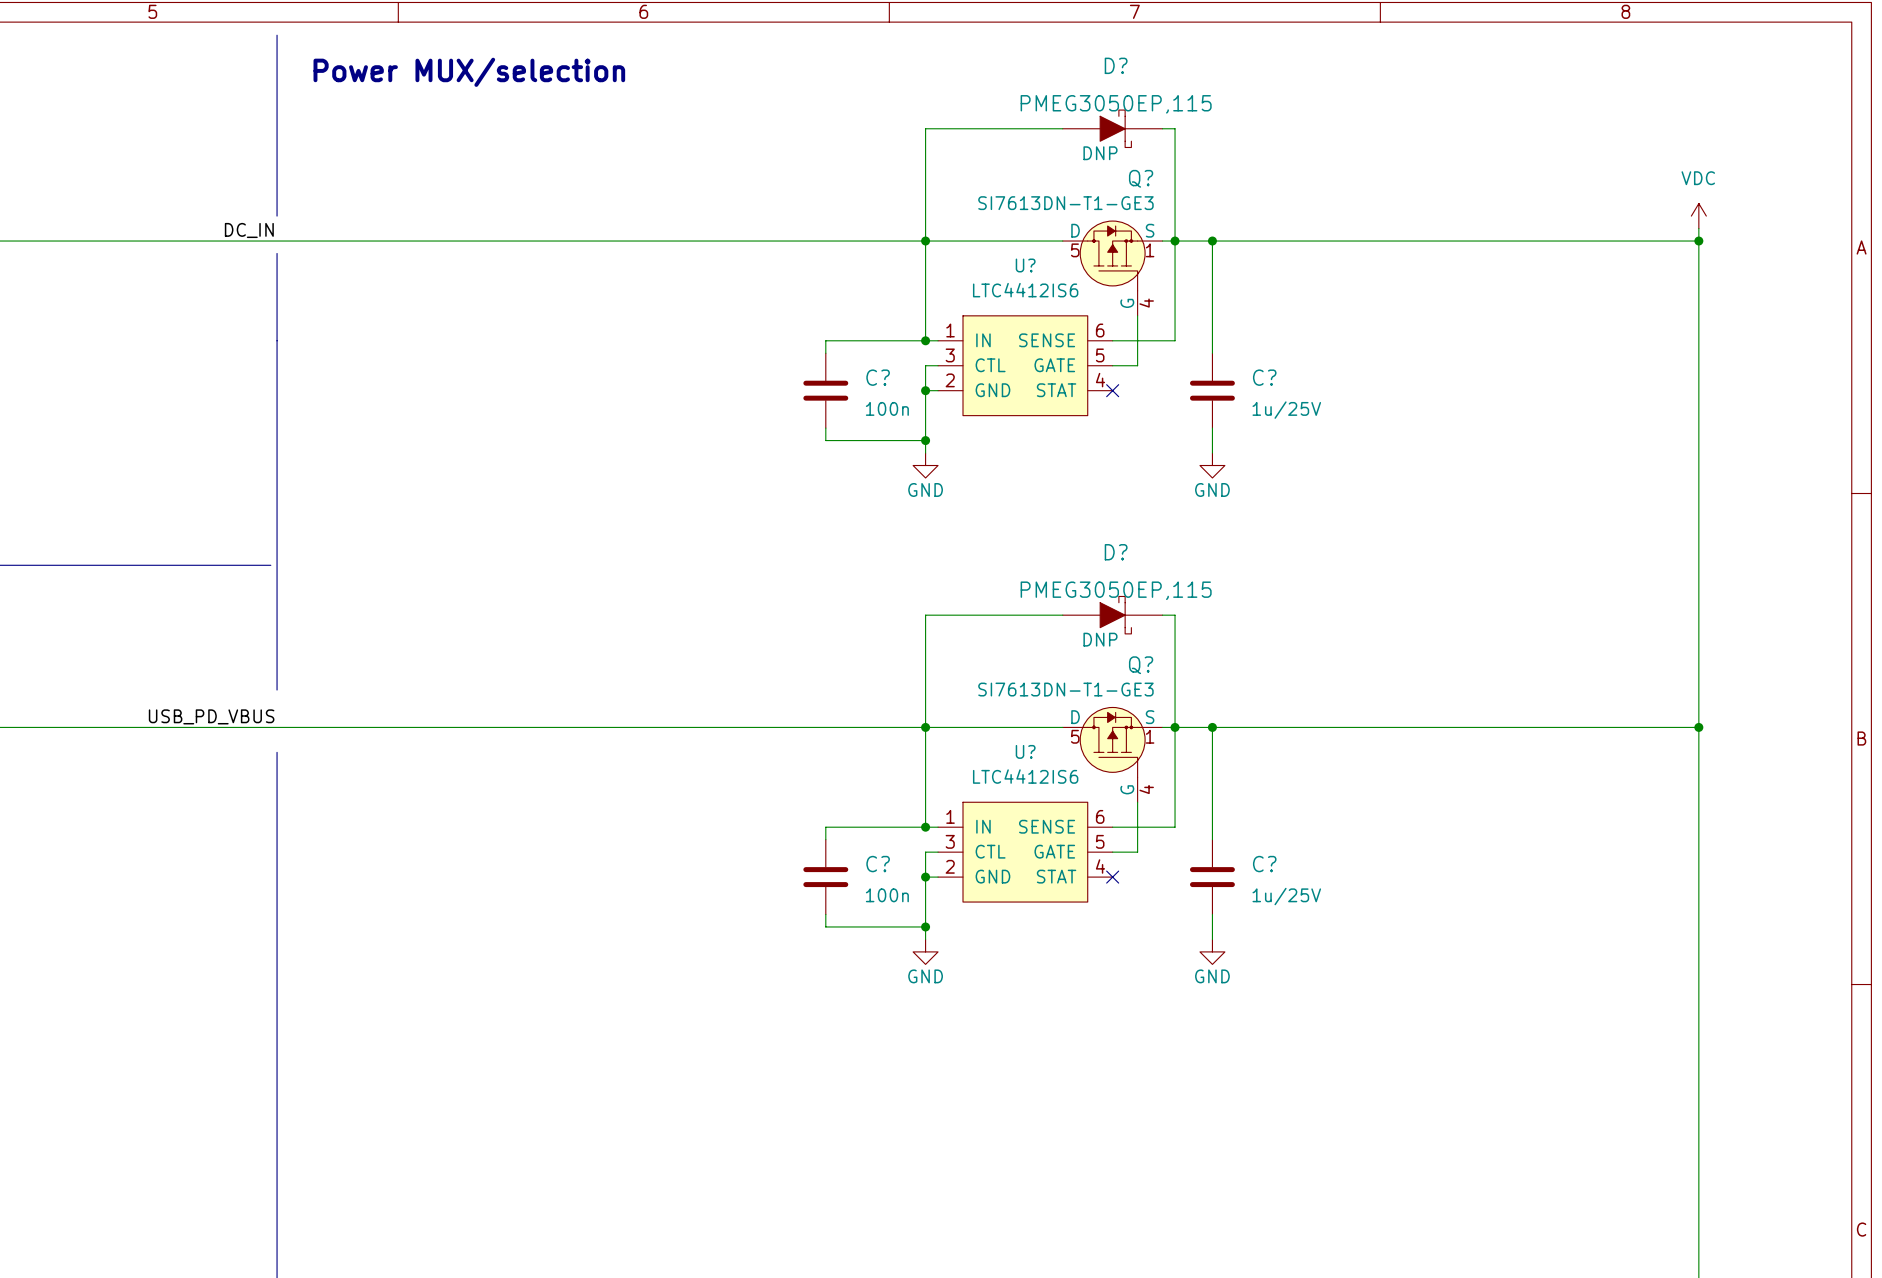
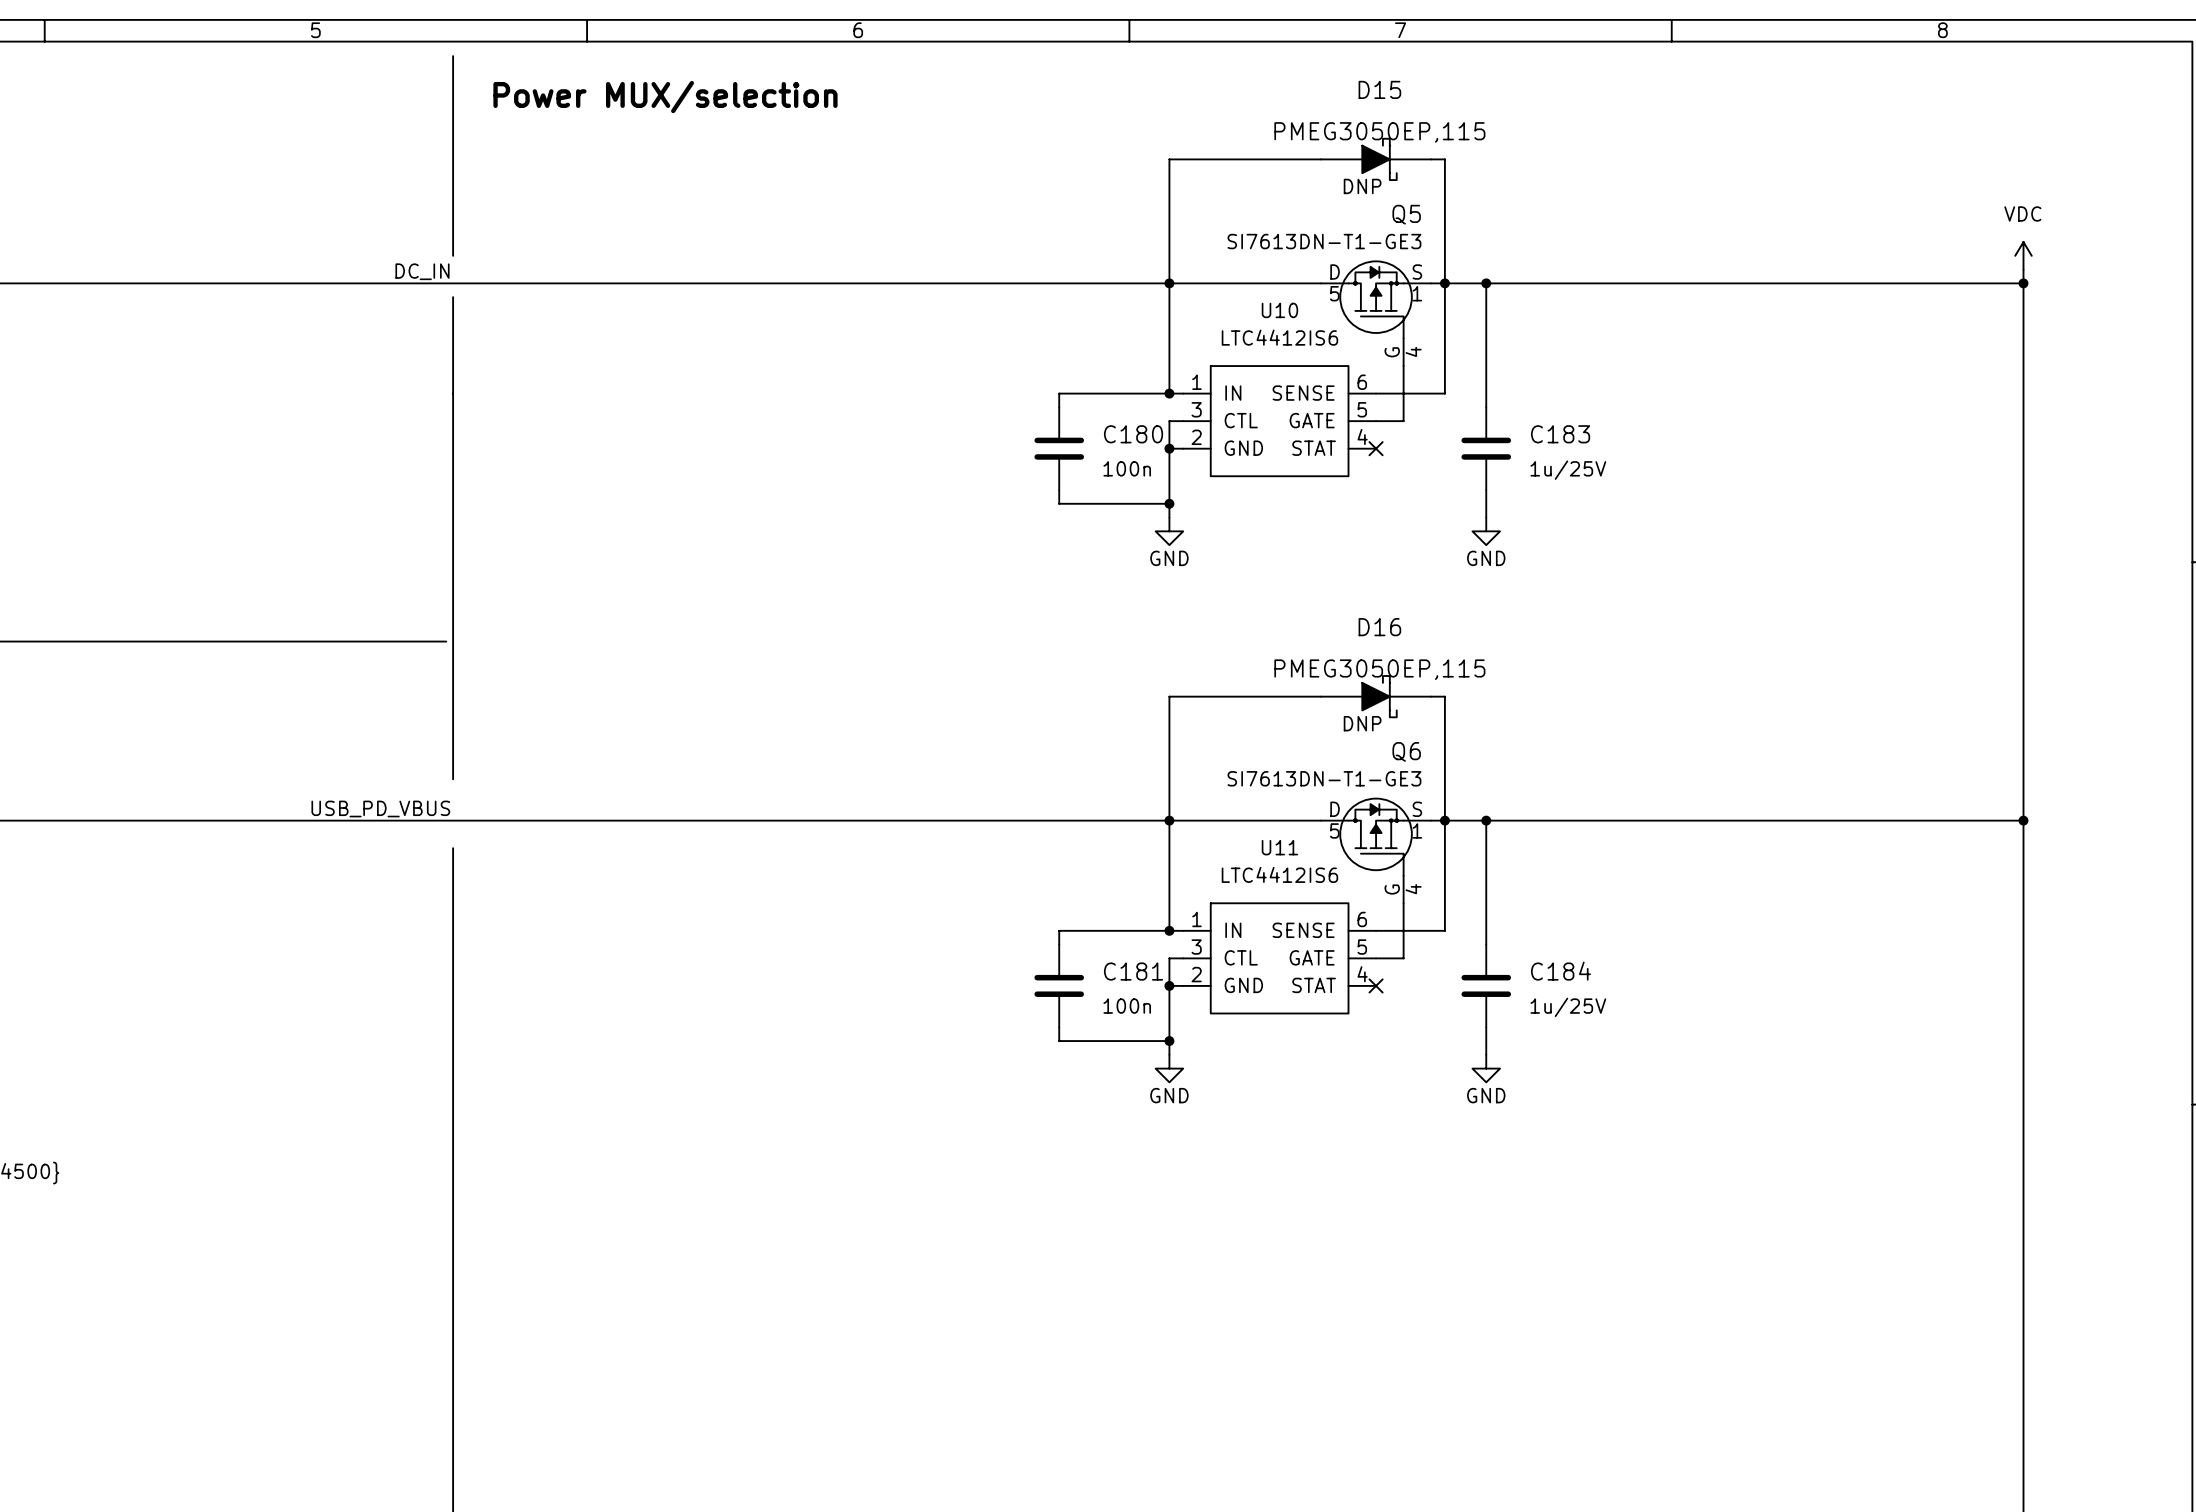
D? name: D? (1116, 65) -> D15 (1379, 89)
Q? name: Q? (1141, 178) -> Q5 (1406, 214)
U? name: U? (1025, 265) -> U10 (1279, 310)
C? name: C? (878, 377) -> C180 (1133, 434)
C? name: C? (1264, 377) -> C183 (1560, 434)
D? name: D? (1116, 552) -> D16 (1379, 627)
Q? name: Q? (1141, 665) -> Q6 (1406, 751)
U? name: U? (1025, 751) -> U11 (1279, 847)
C? name: C? (878, 864) -> C181 (1133, 971)
C? name: C? (1264, 864) -> C184 (1560, 971)

